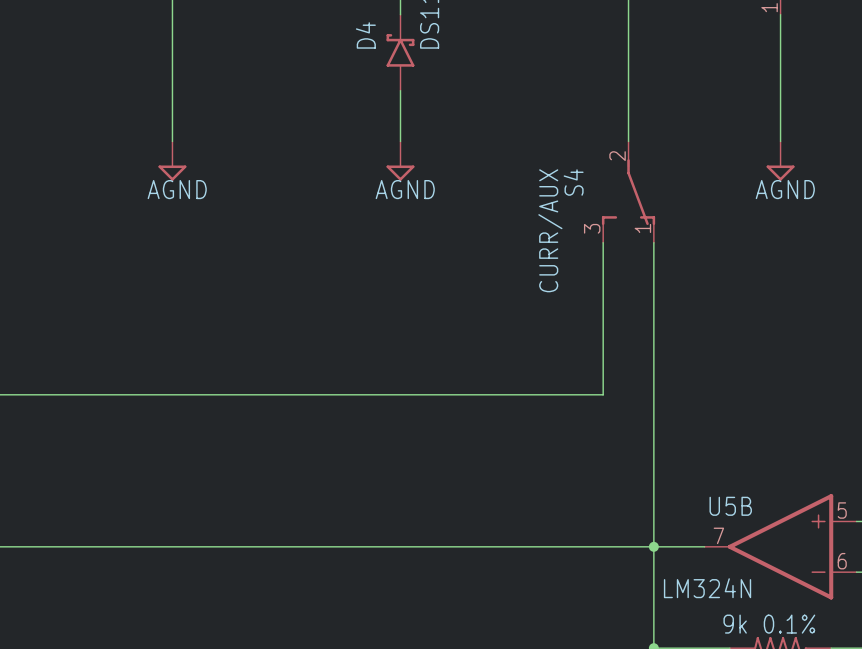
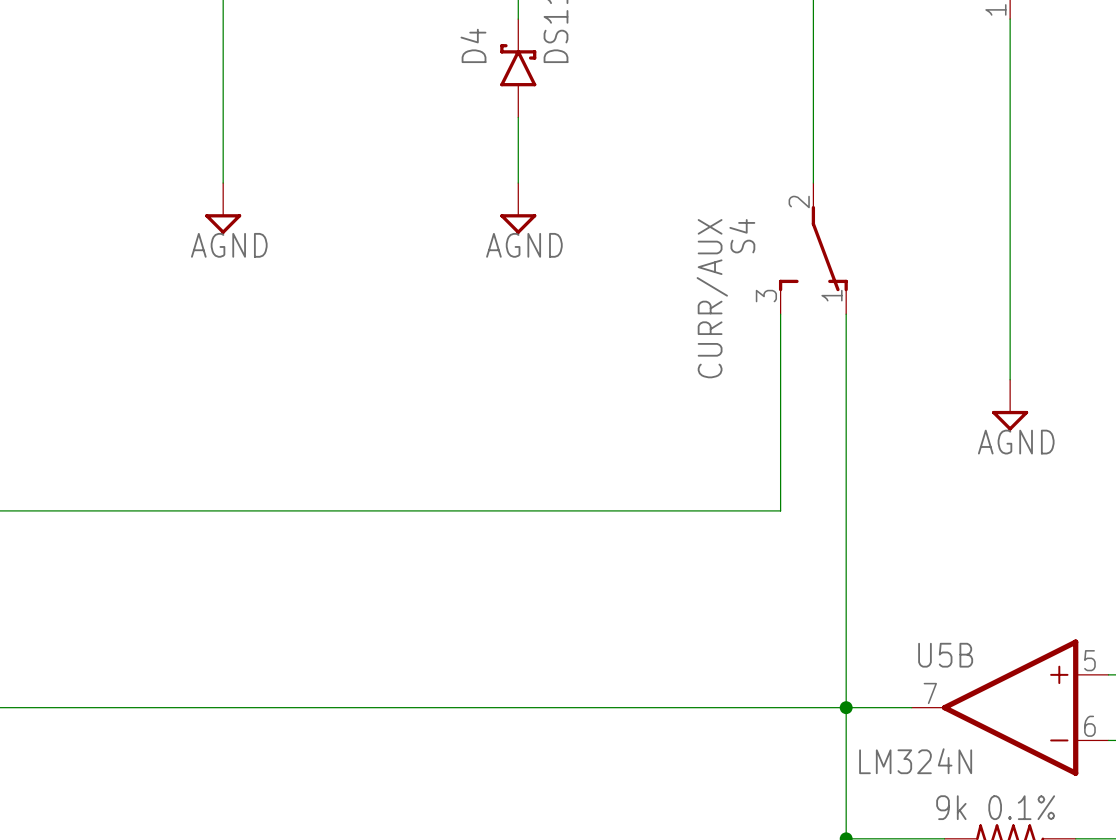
wire: none -> (1010, 183) (1010, 379)
power symbol position: AGND (780, 161) -> AGND (1010, 405)

